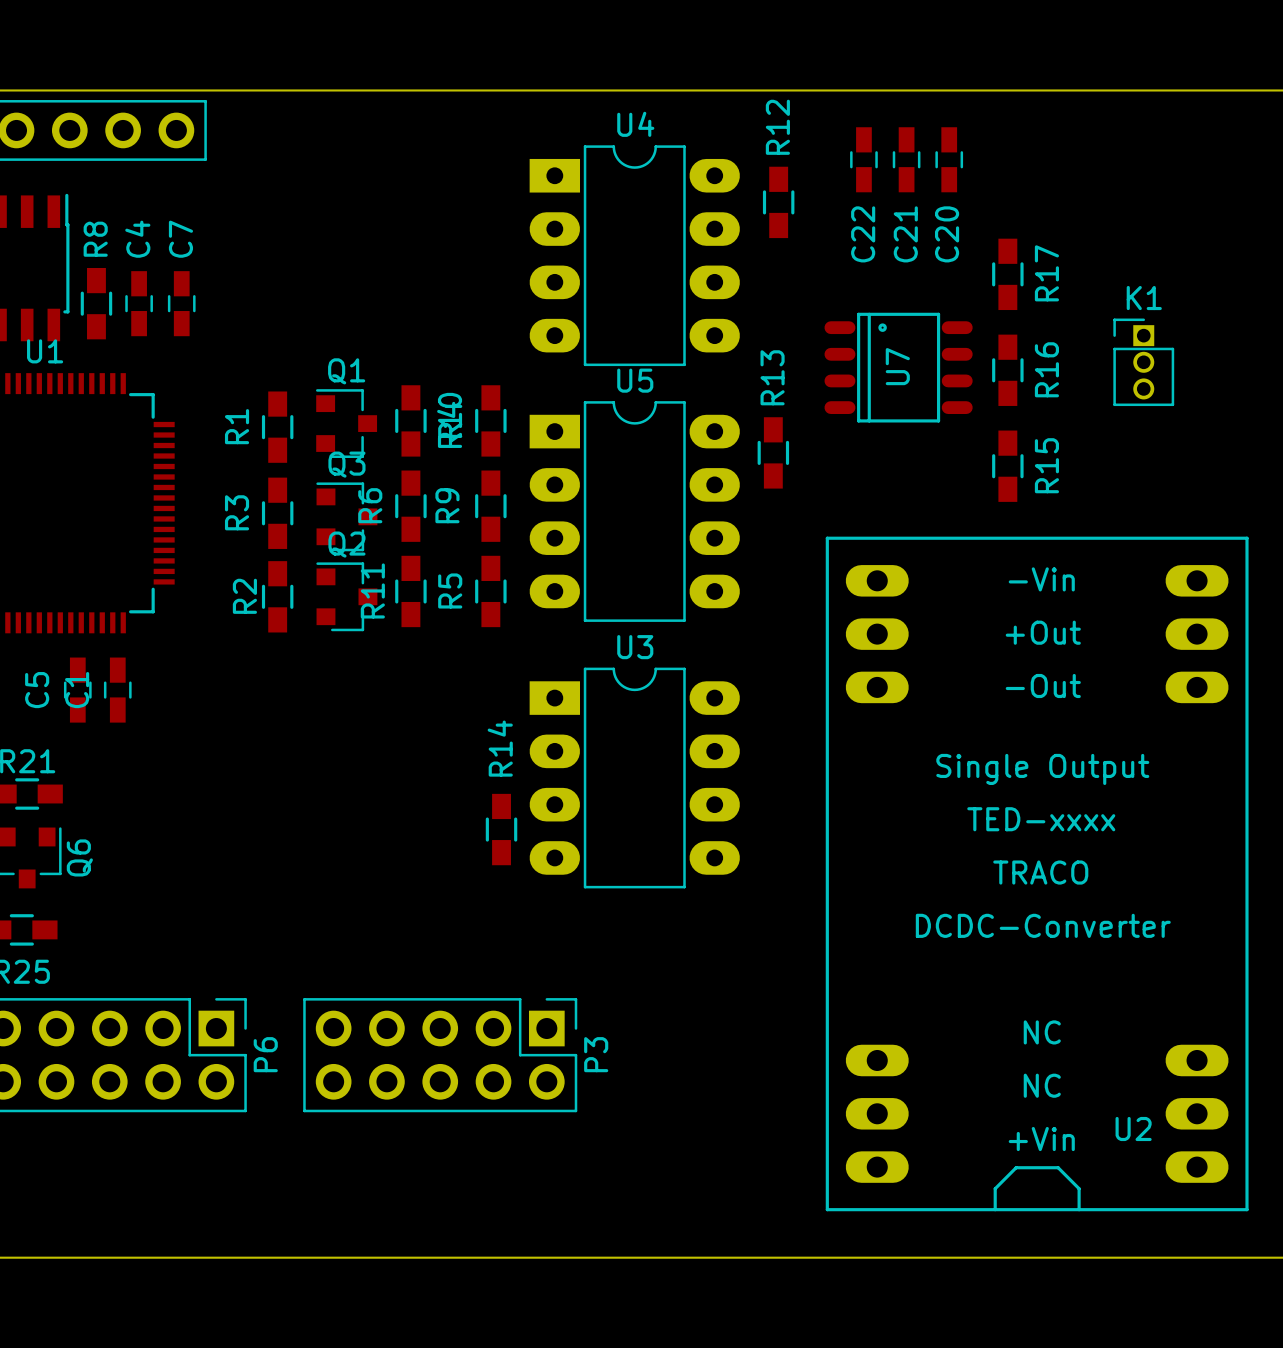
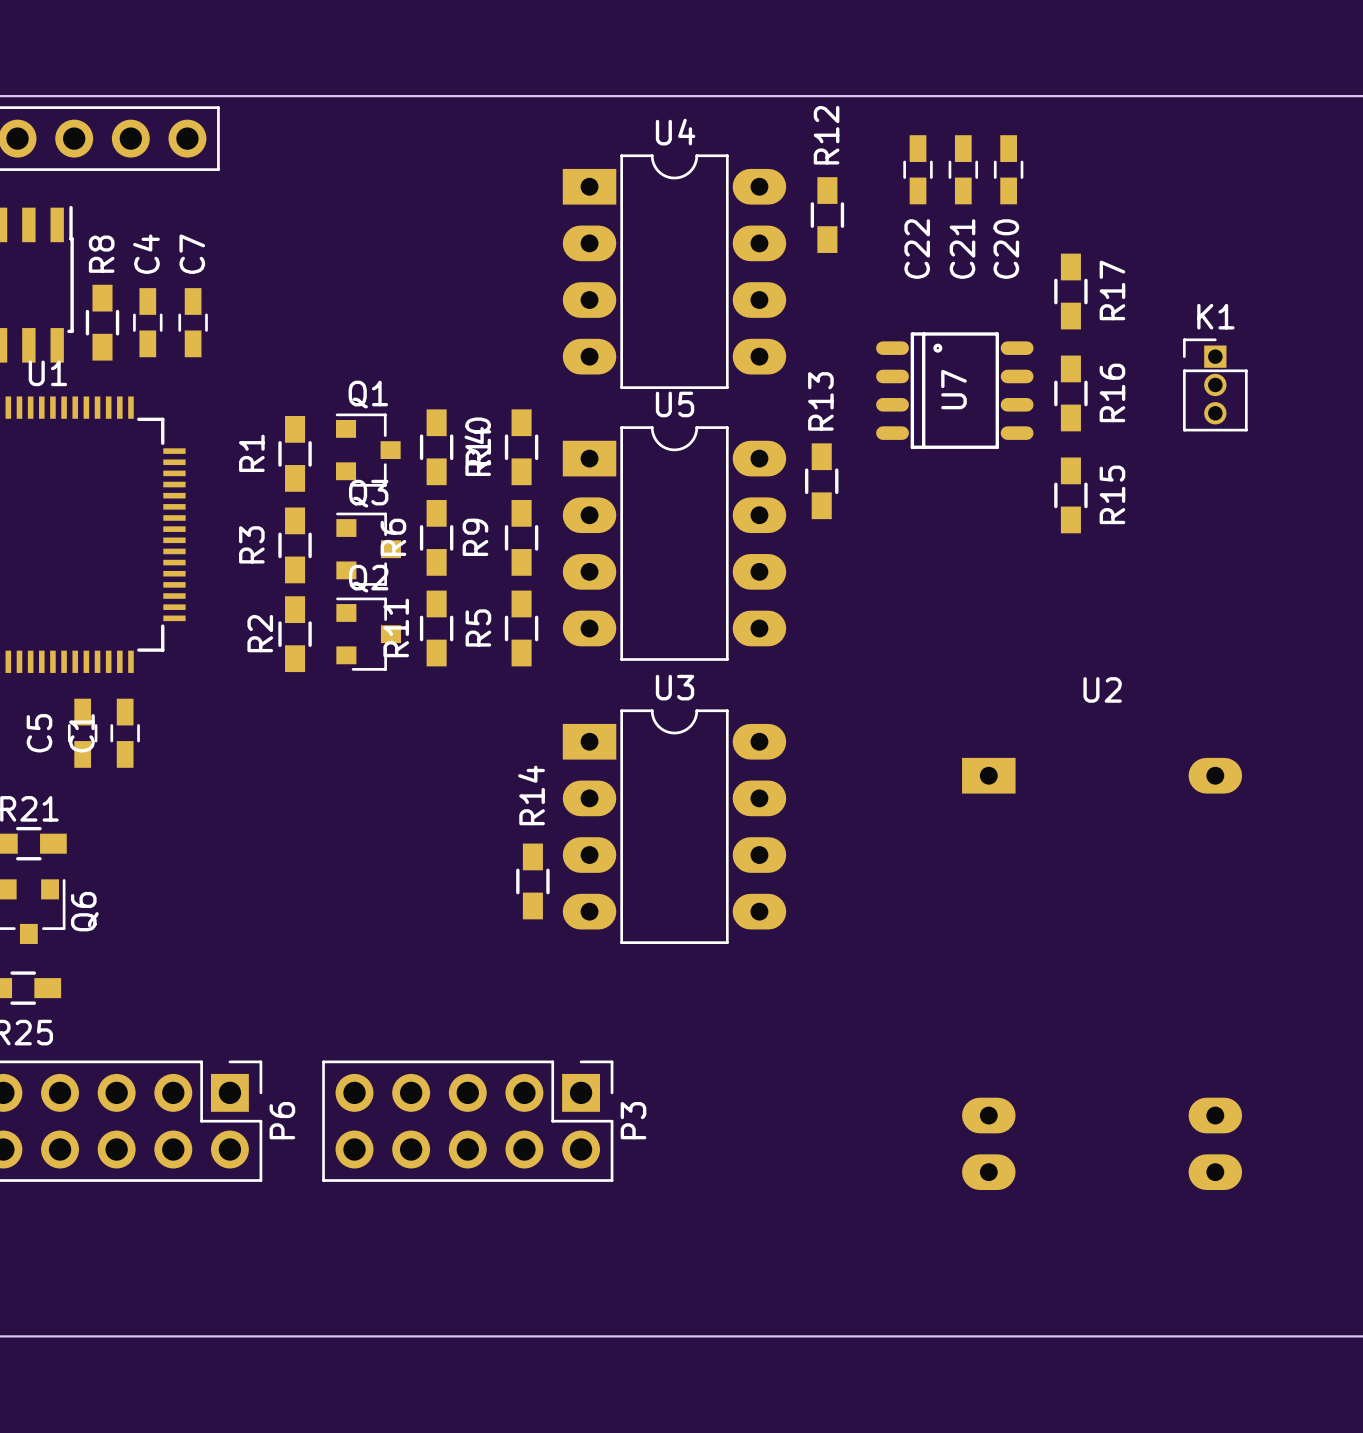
U2 footprint: [825, 536, 1249, 1212] -> [962, 757, 1243, 1191]
U2 name position: U2 (1133, 1128) -> U2 (1102, 689)

